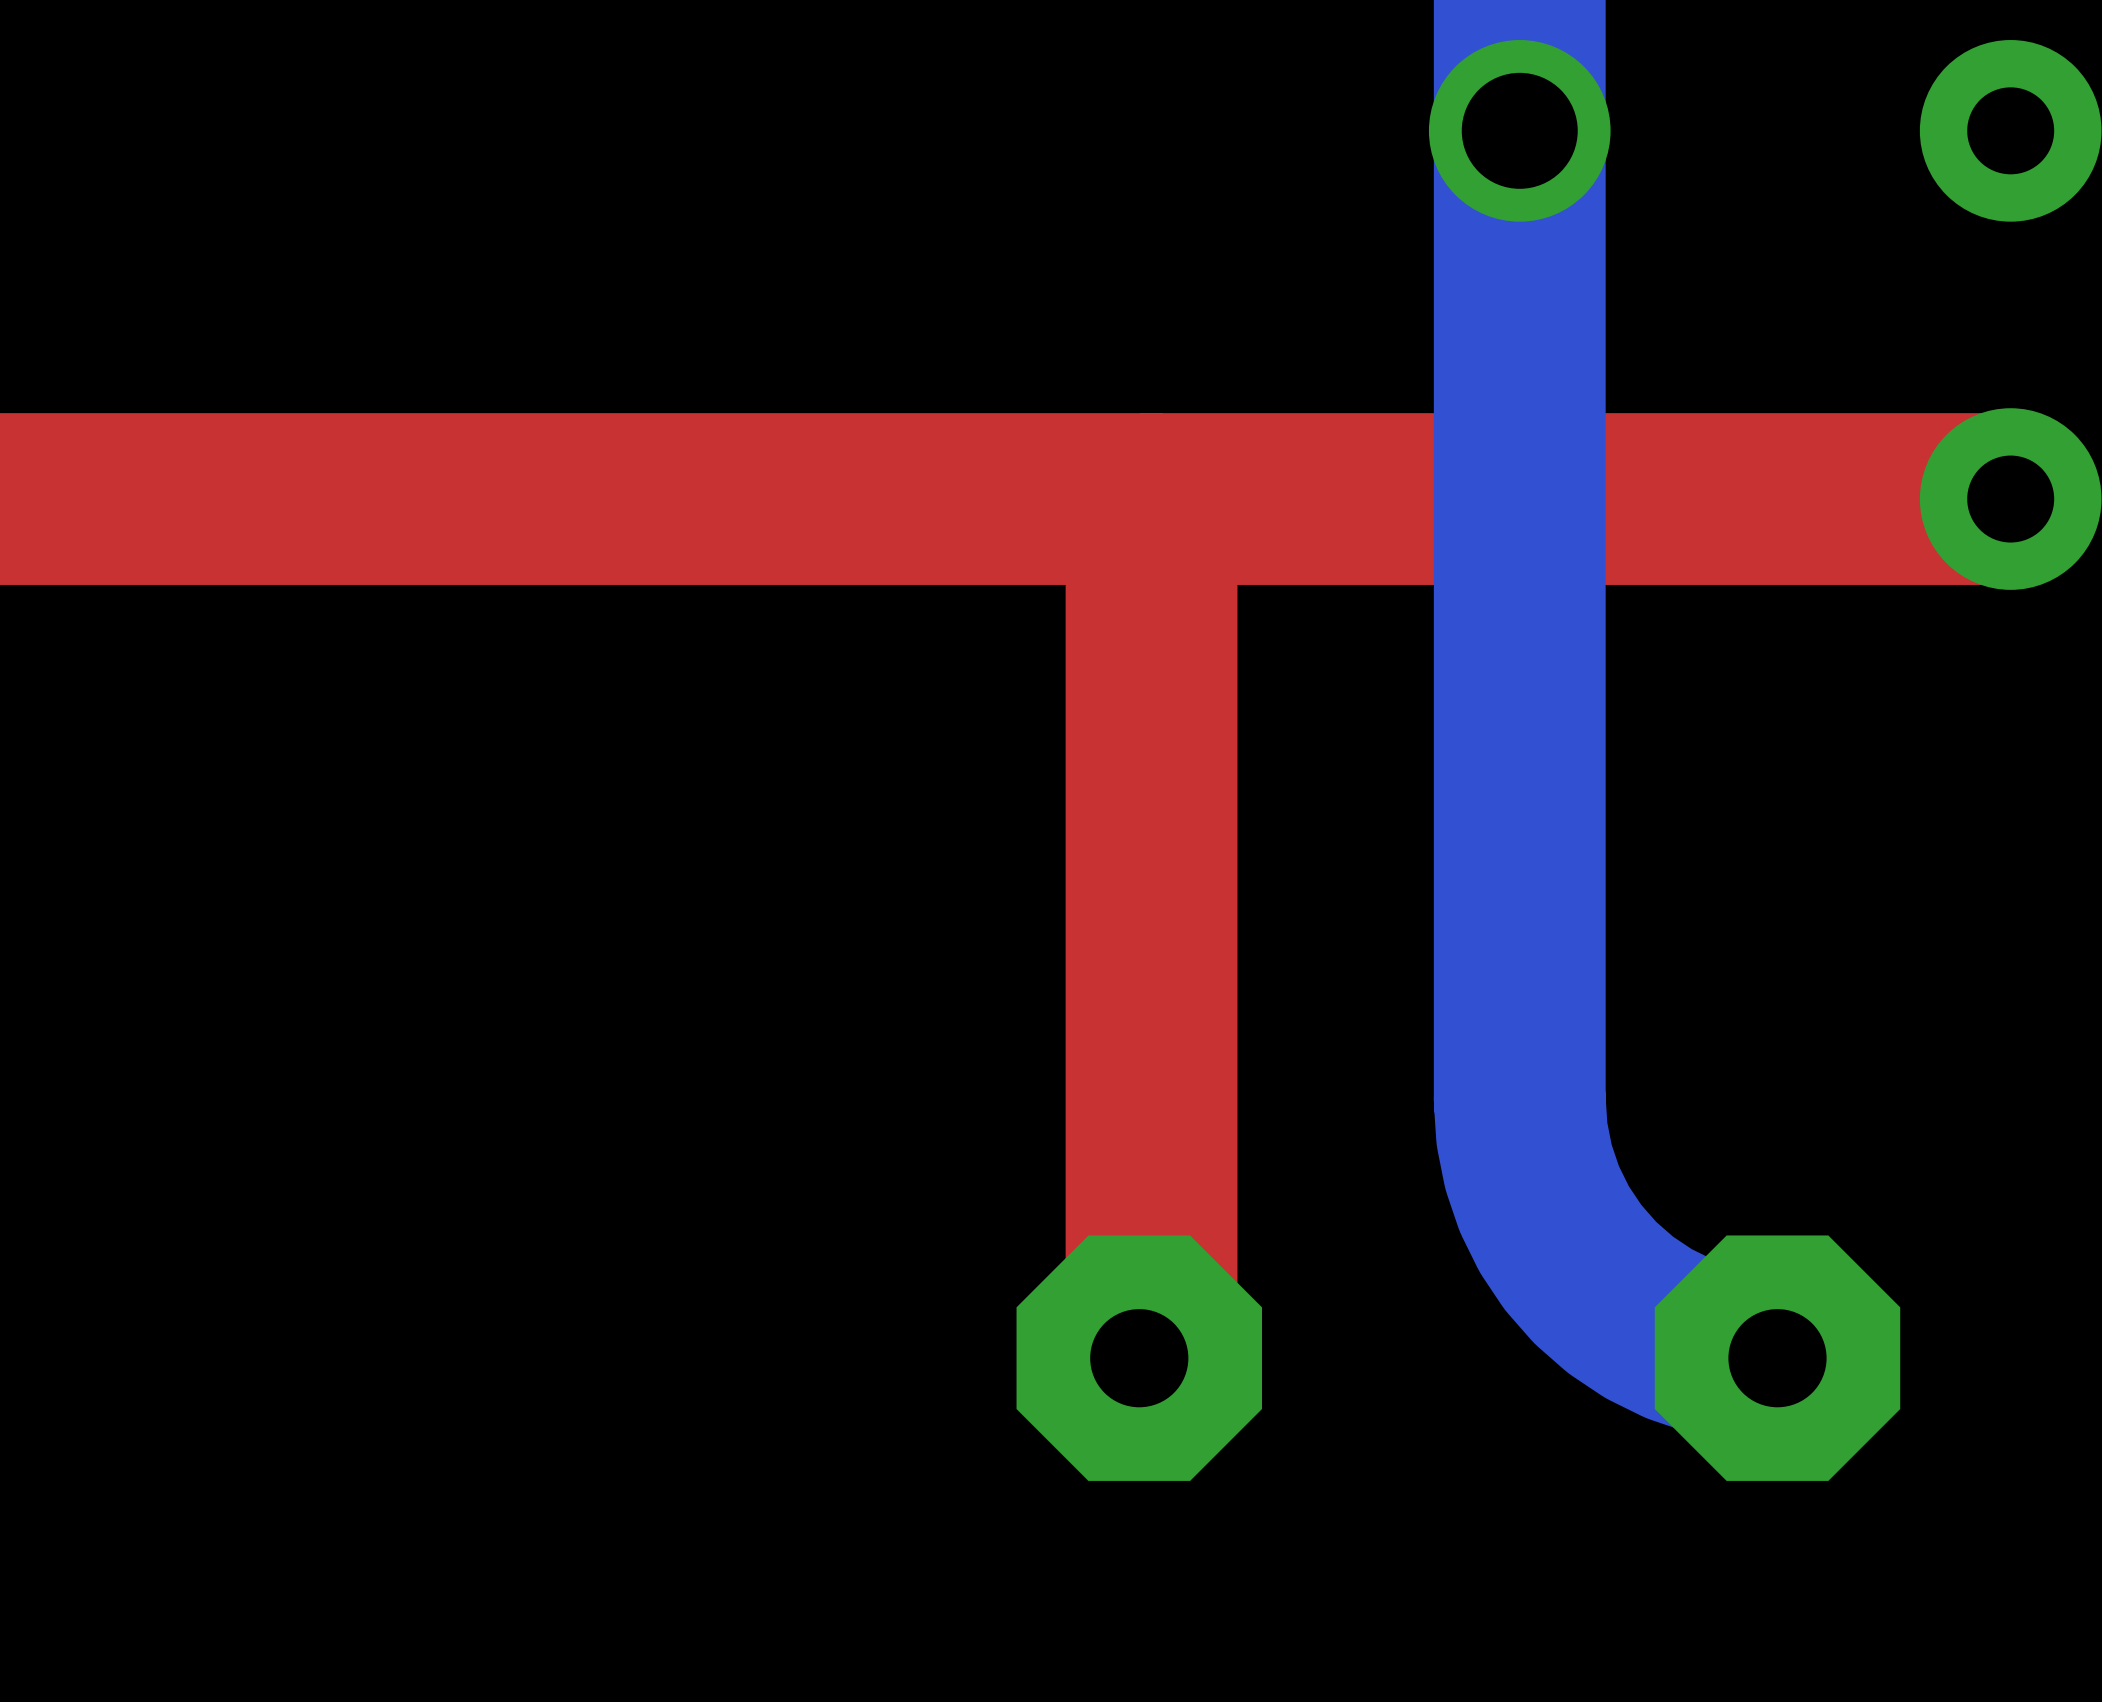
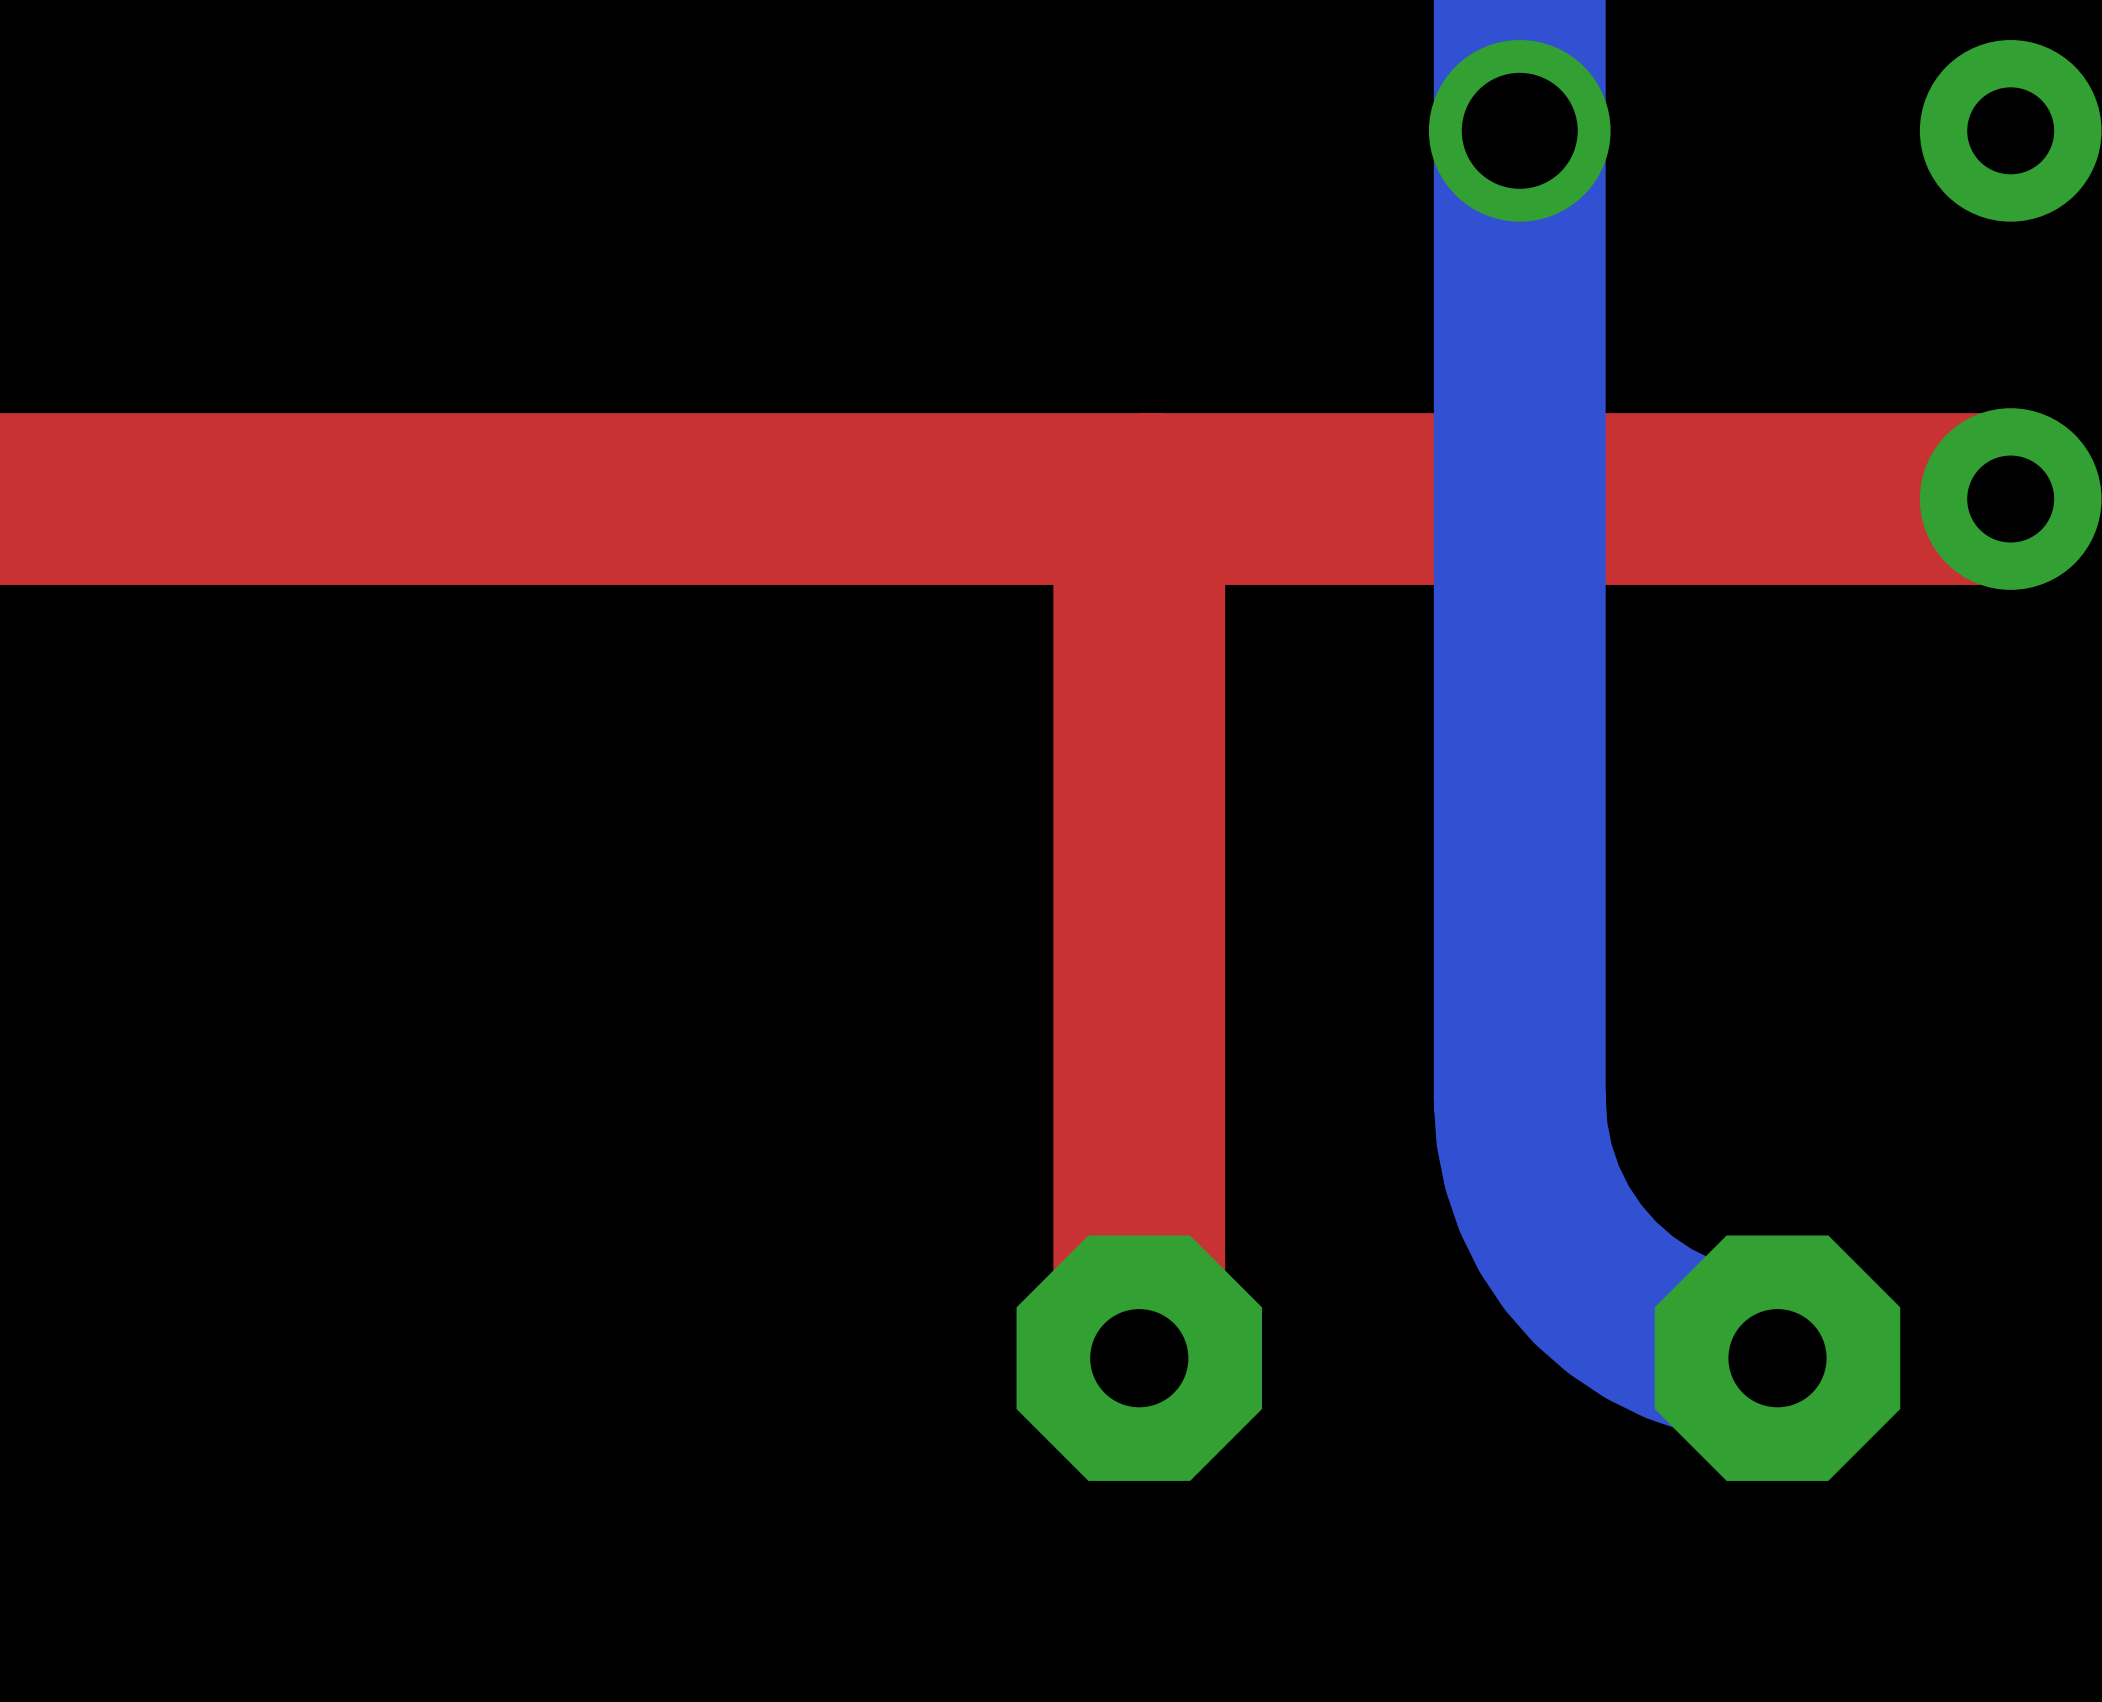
top track: (1151, 499) (1151, 1345) (1147, 1354) (1139, 1358) -> (1151, 499) (1142, 502) (1139, 511) (1139, 1358)

